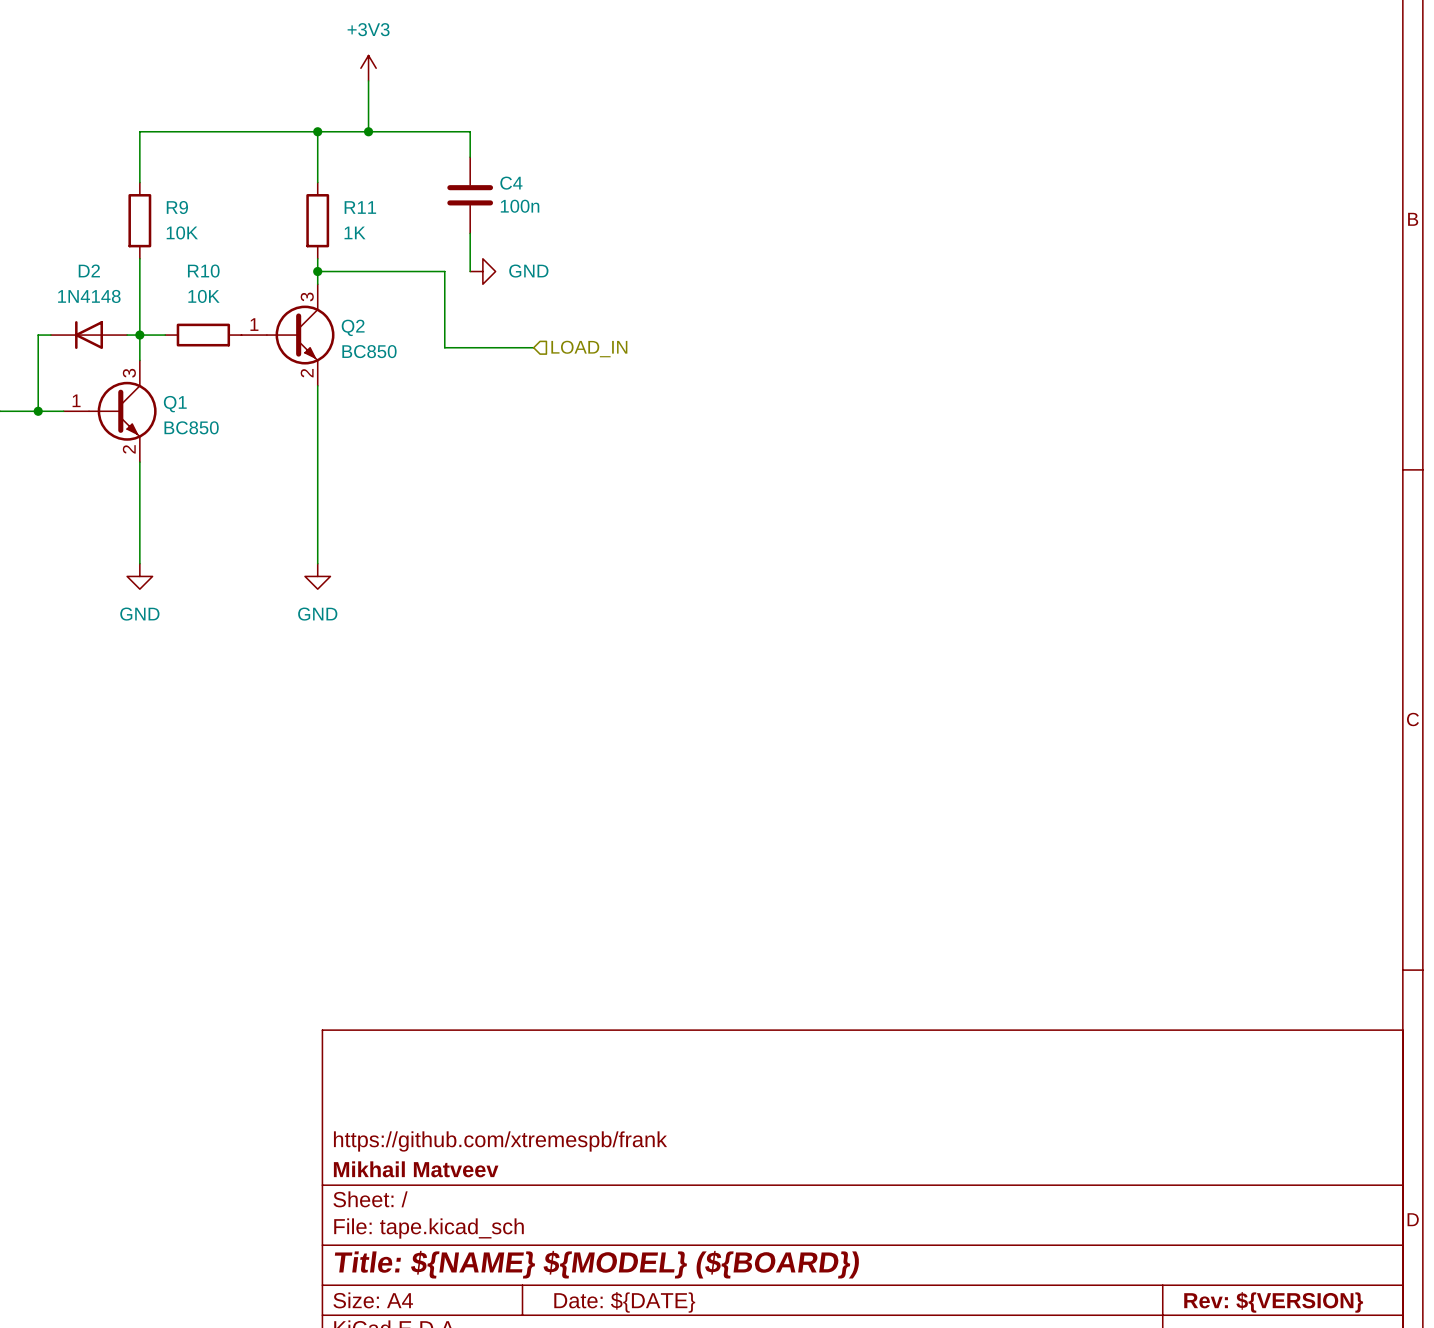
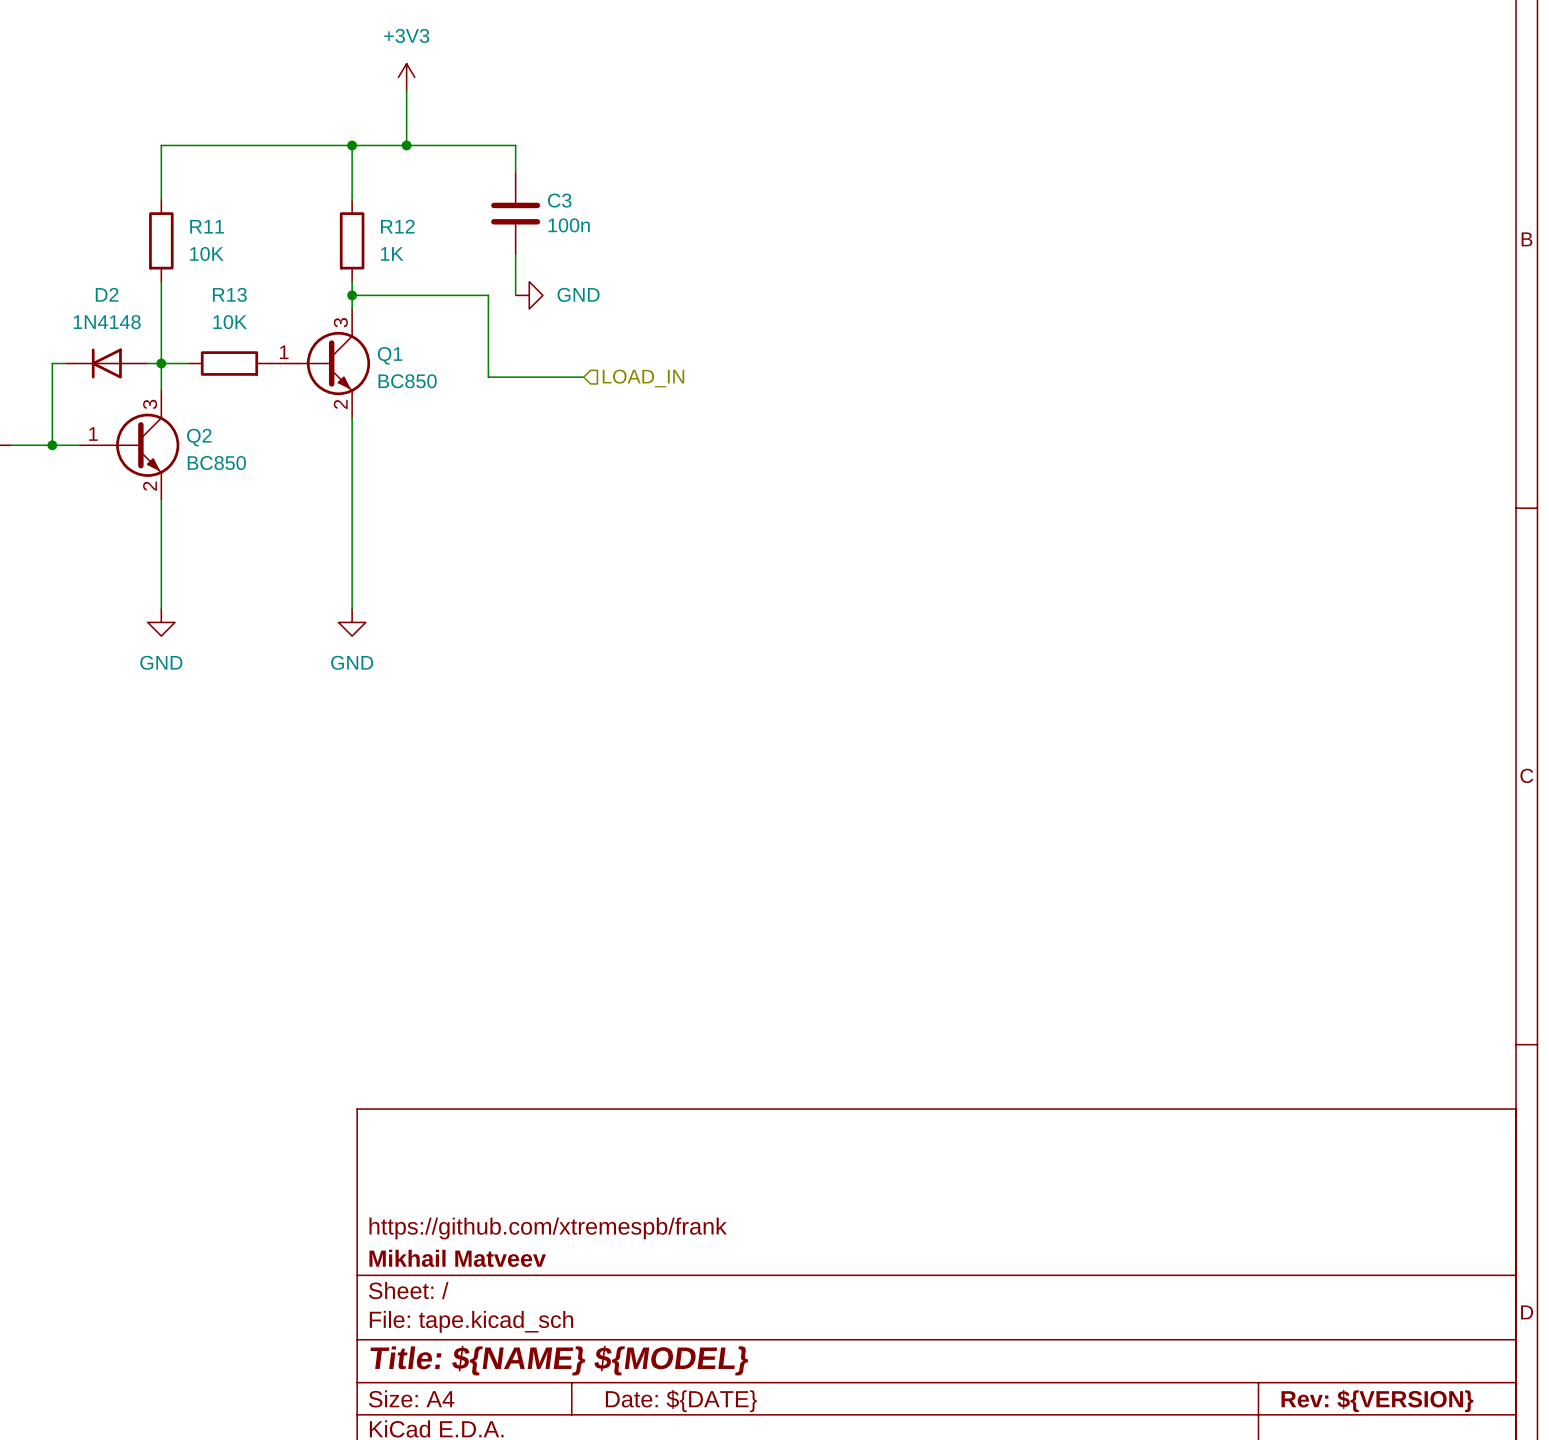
C4 name: C4 (511, 183) -> C3 (559, 200)
R9 name: R9 (177, 207) -> R11 (207, 226)
R11 name: R11 (360, 207) -> R12 (397, 226)
R10 name: R10 (203, 271) -> R13 (229, 294)
Q2 name: Q2 (353, 327) -> Q1 (390, 355)
Q1 name: Q1 (175, 404) -> Q2 (199, 437)
title block: Title: ${NAME} ${MODEL} (${BOARD}) (597, 1264) -> Title: ${NAME} ${MODEL} (559, 1360)

